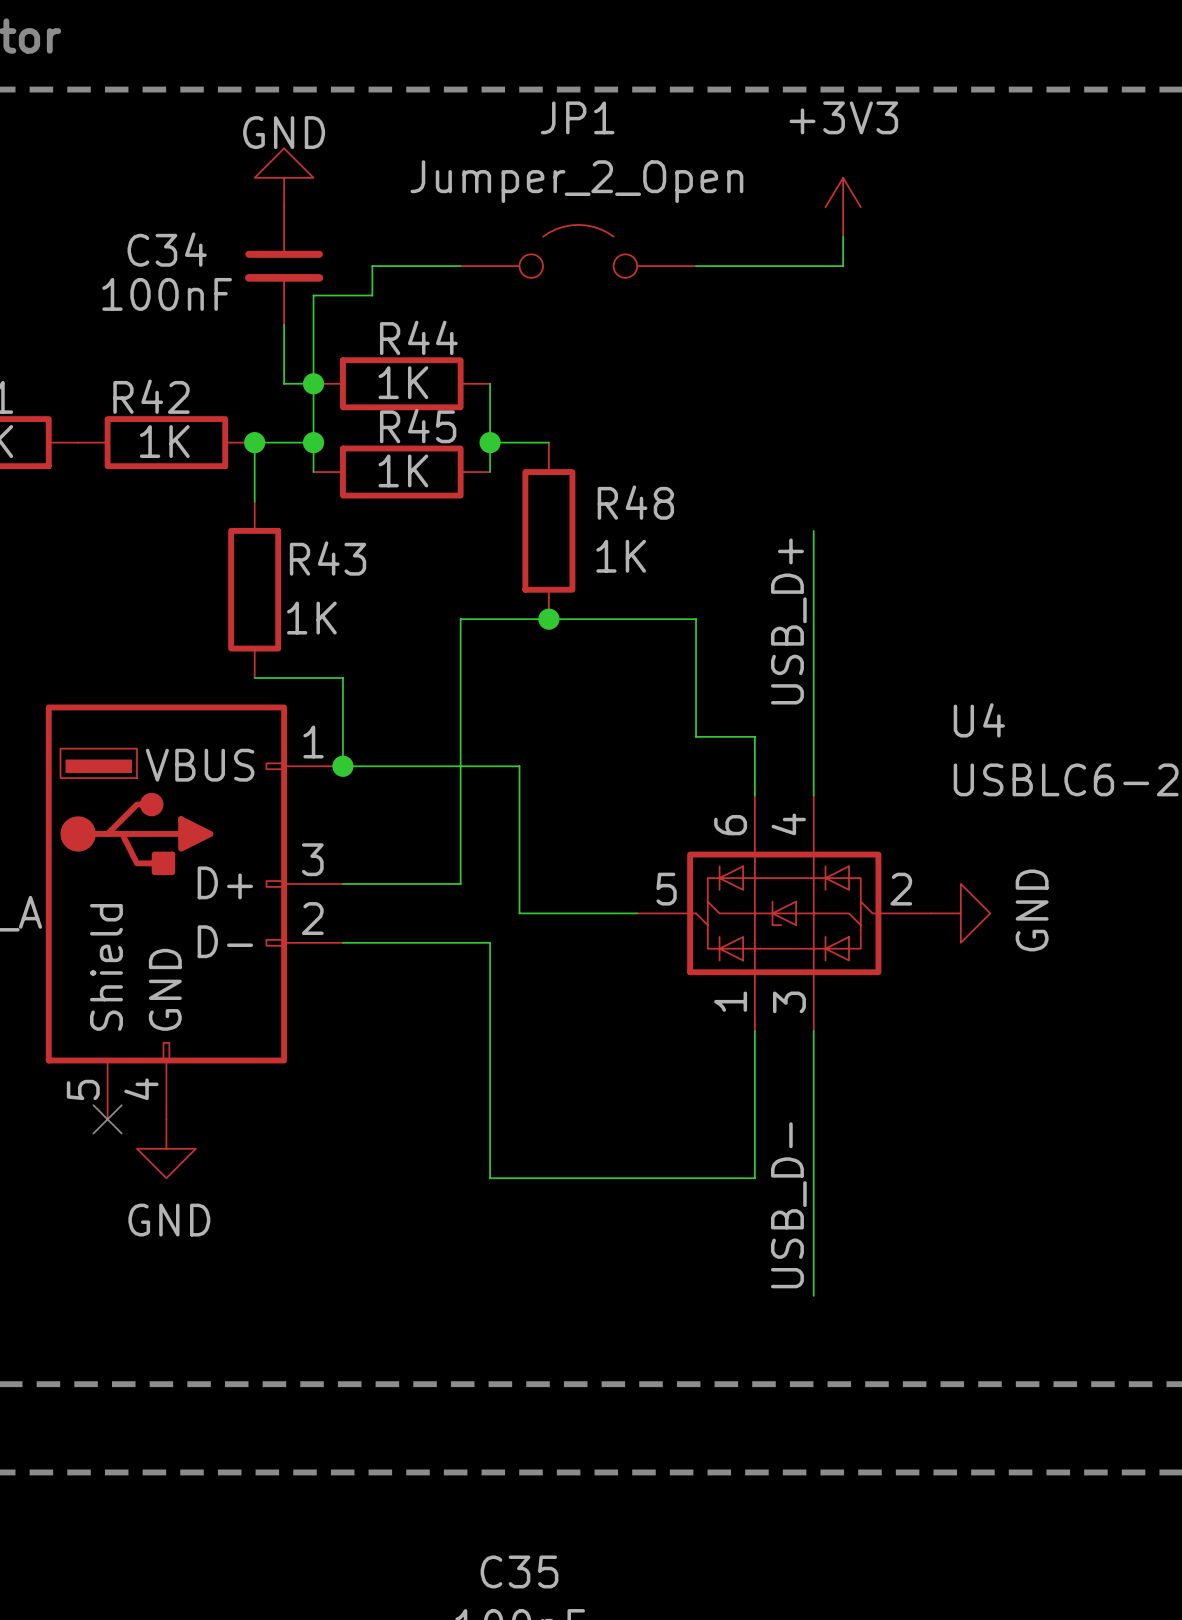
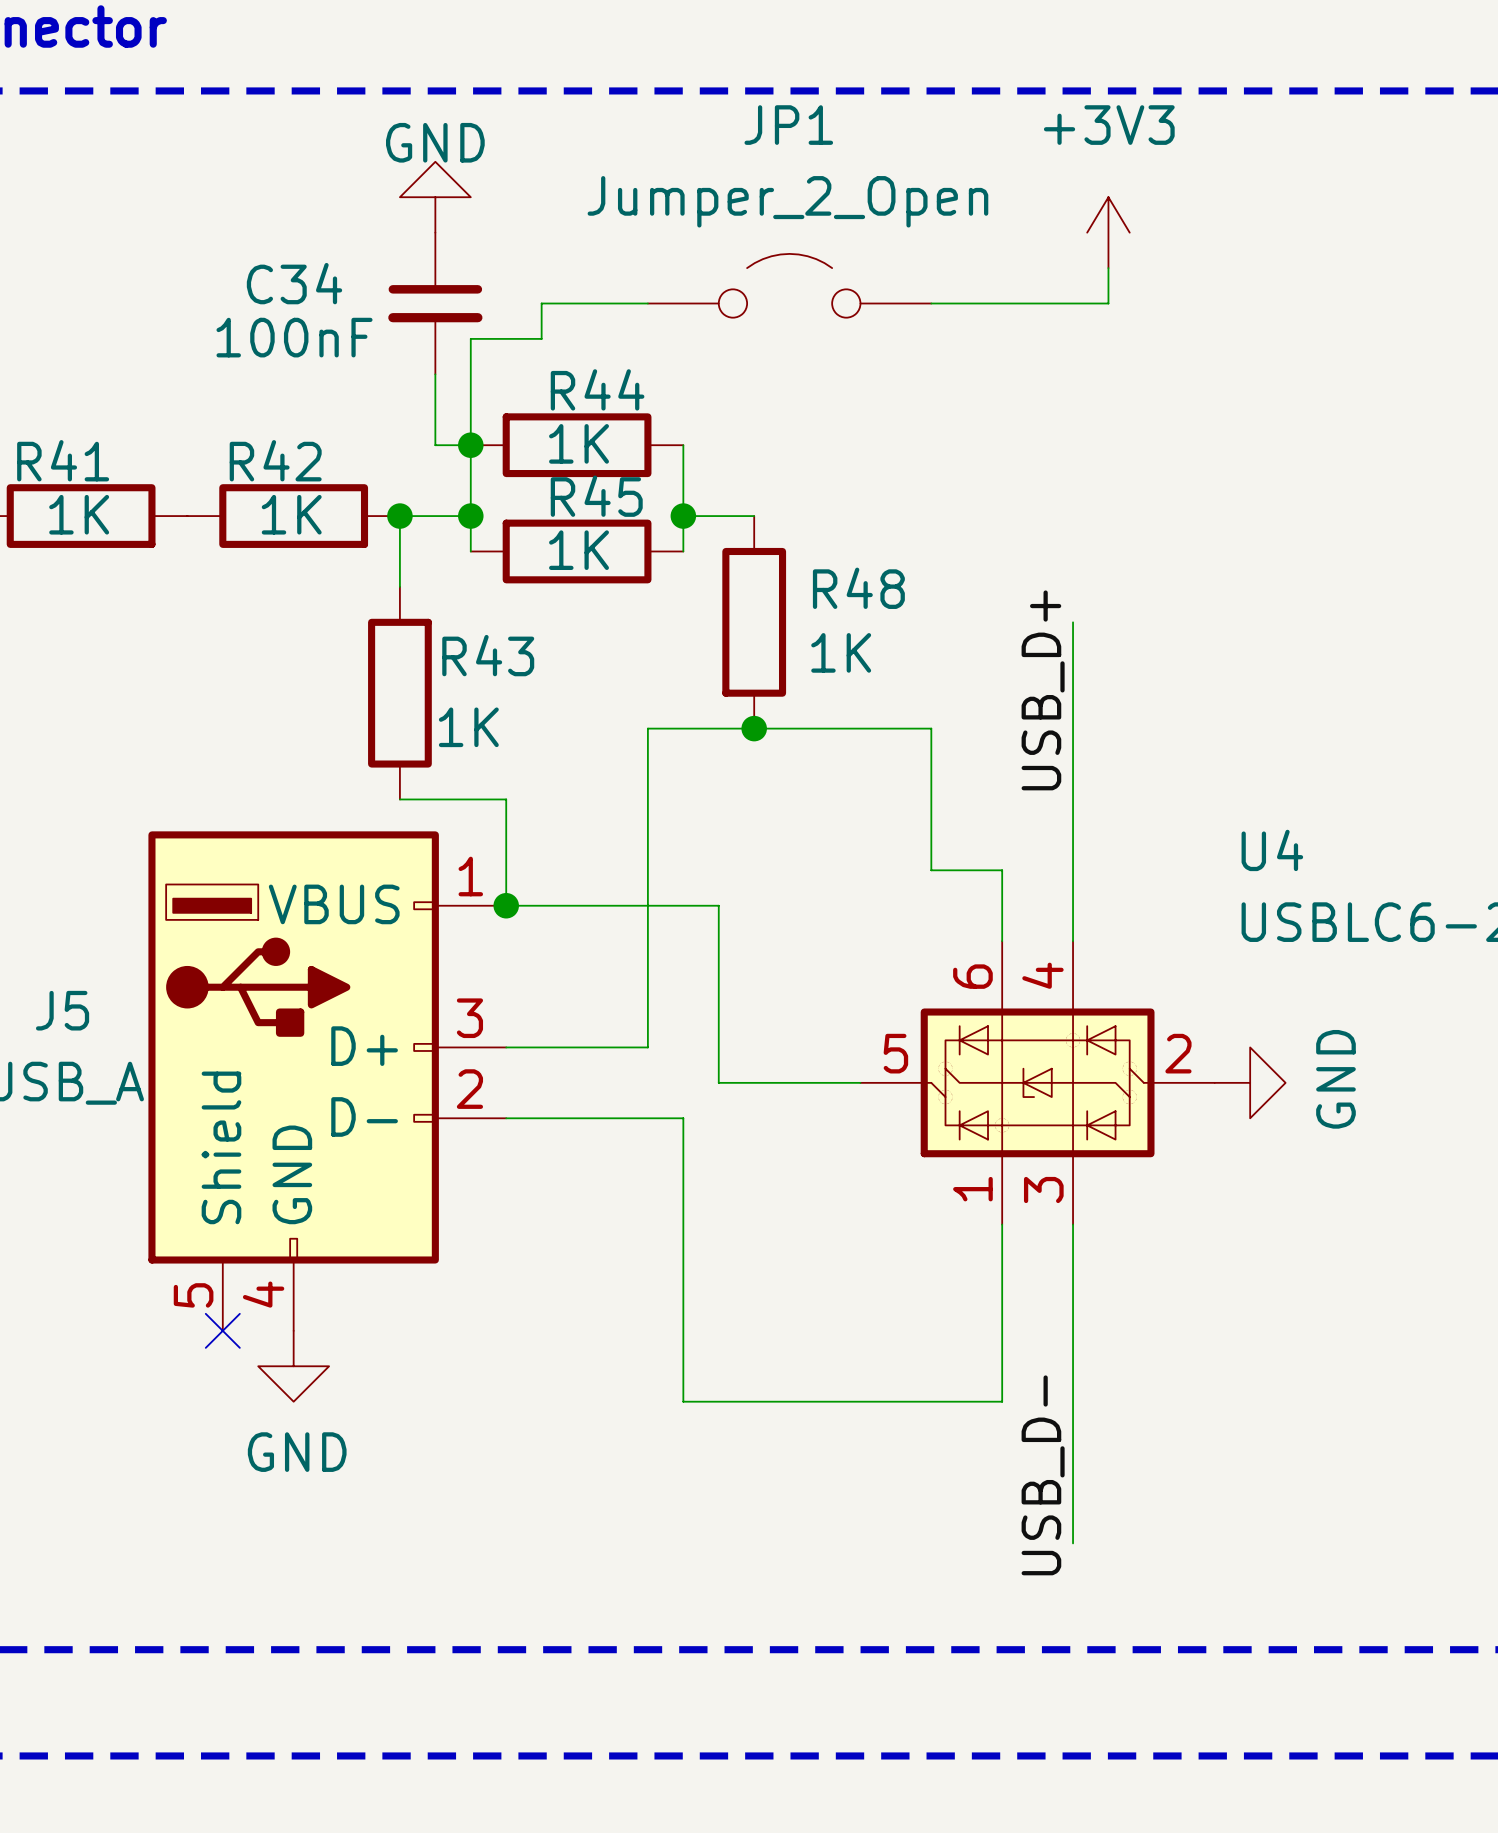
label position: USB_D+ (788, 621) -> USB_D+ (1043, 690)
label position: USB_D- (788, 1205) -> USB_D- (1043, 1475)

